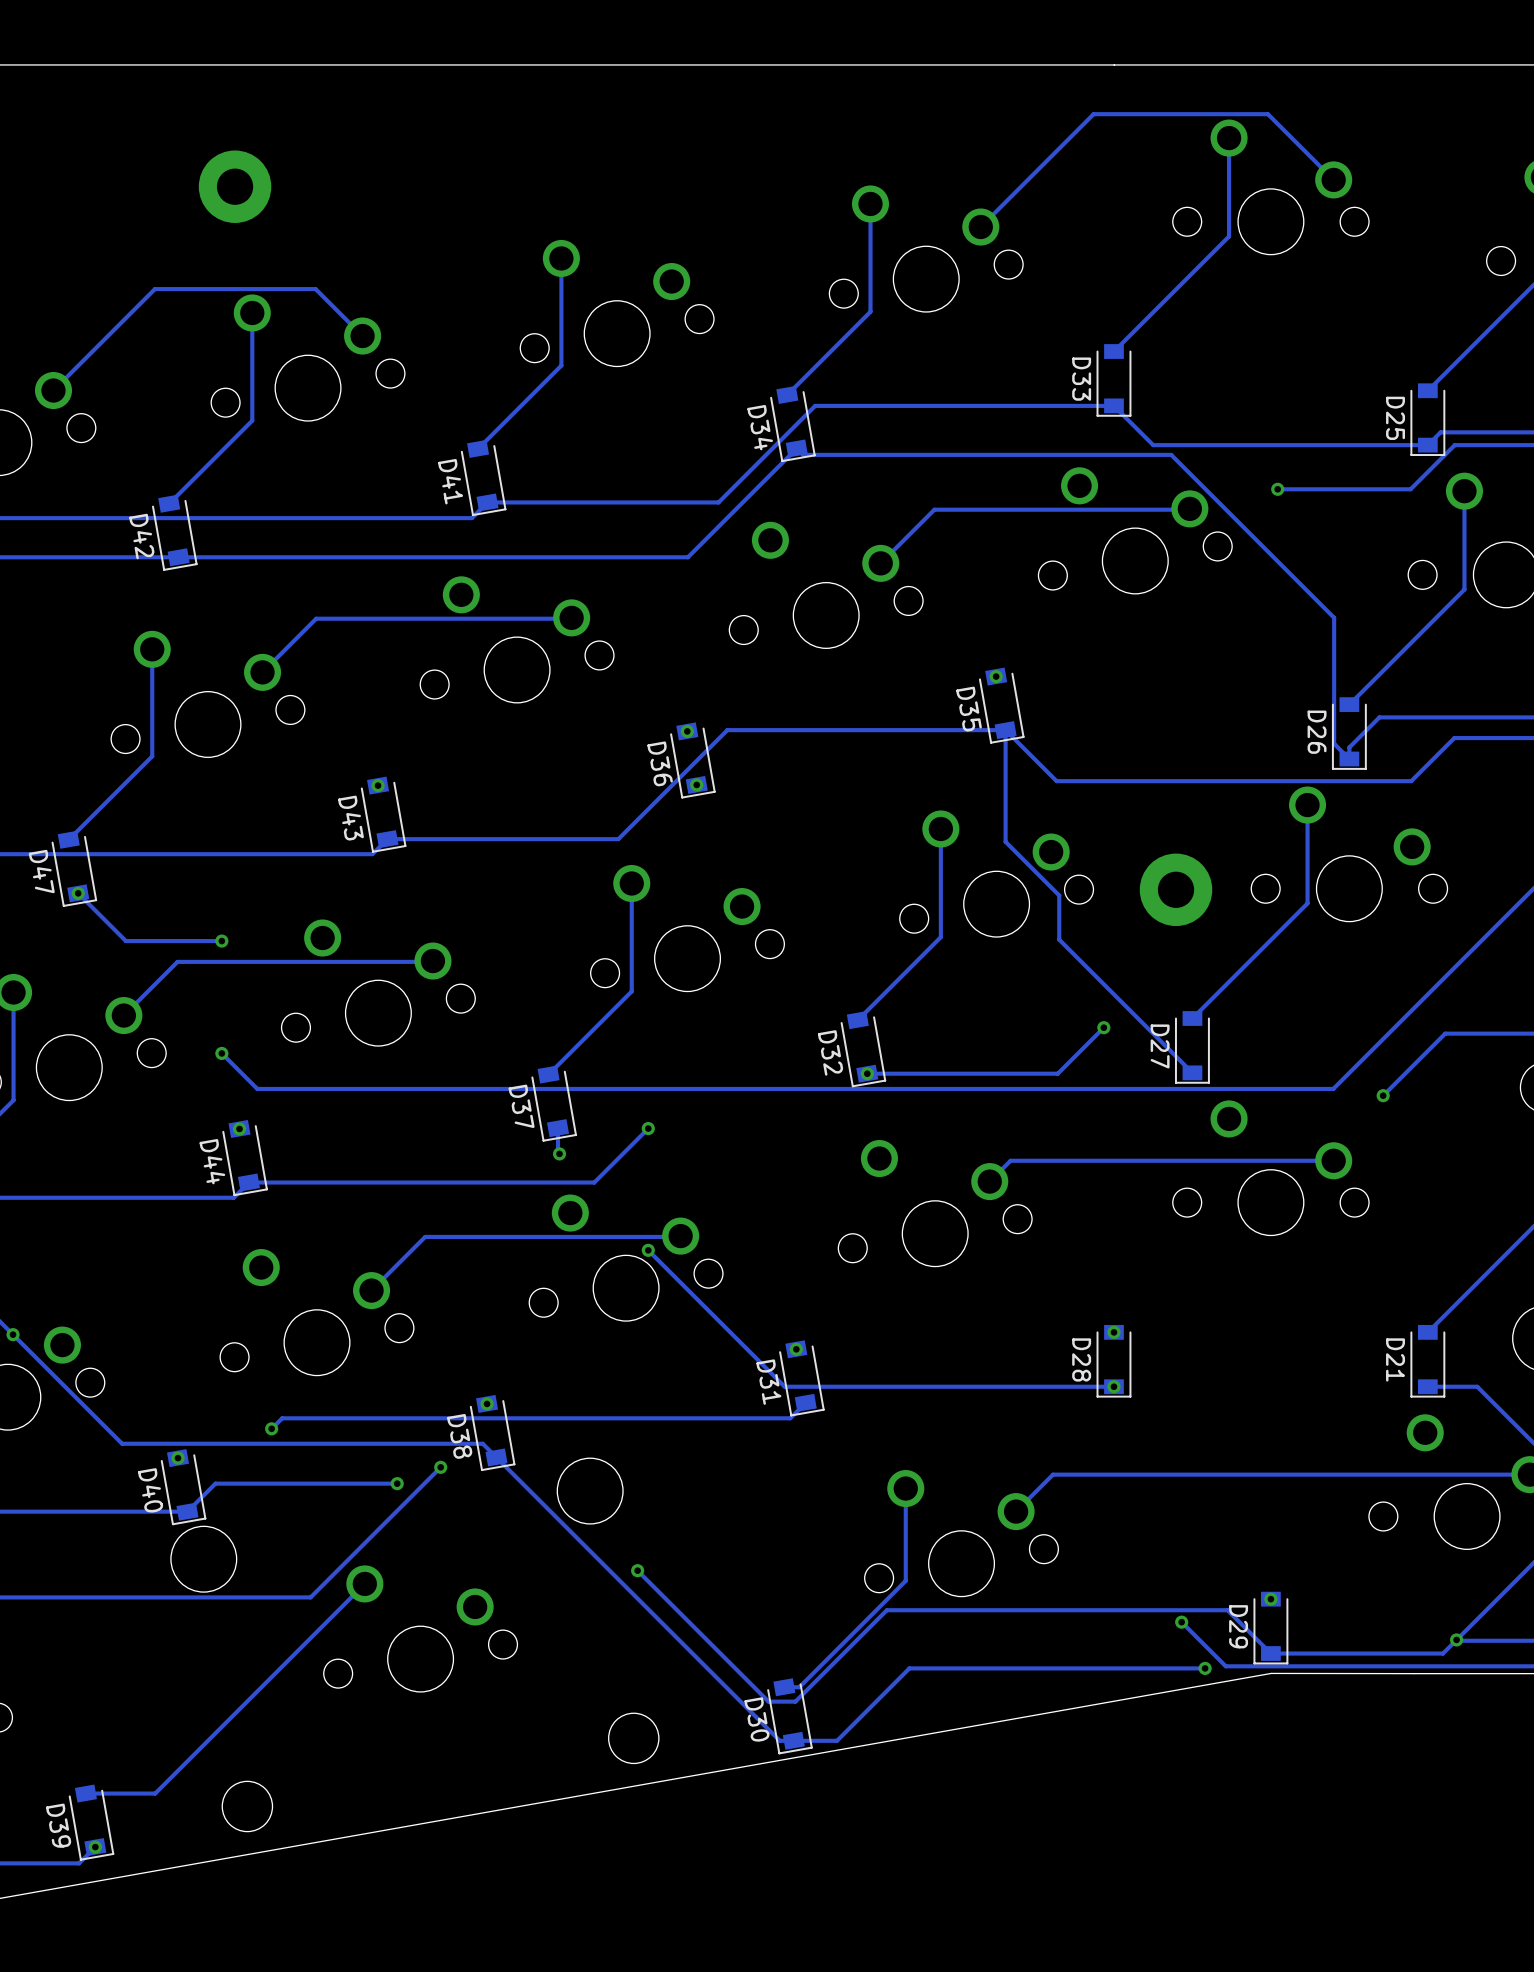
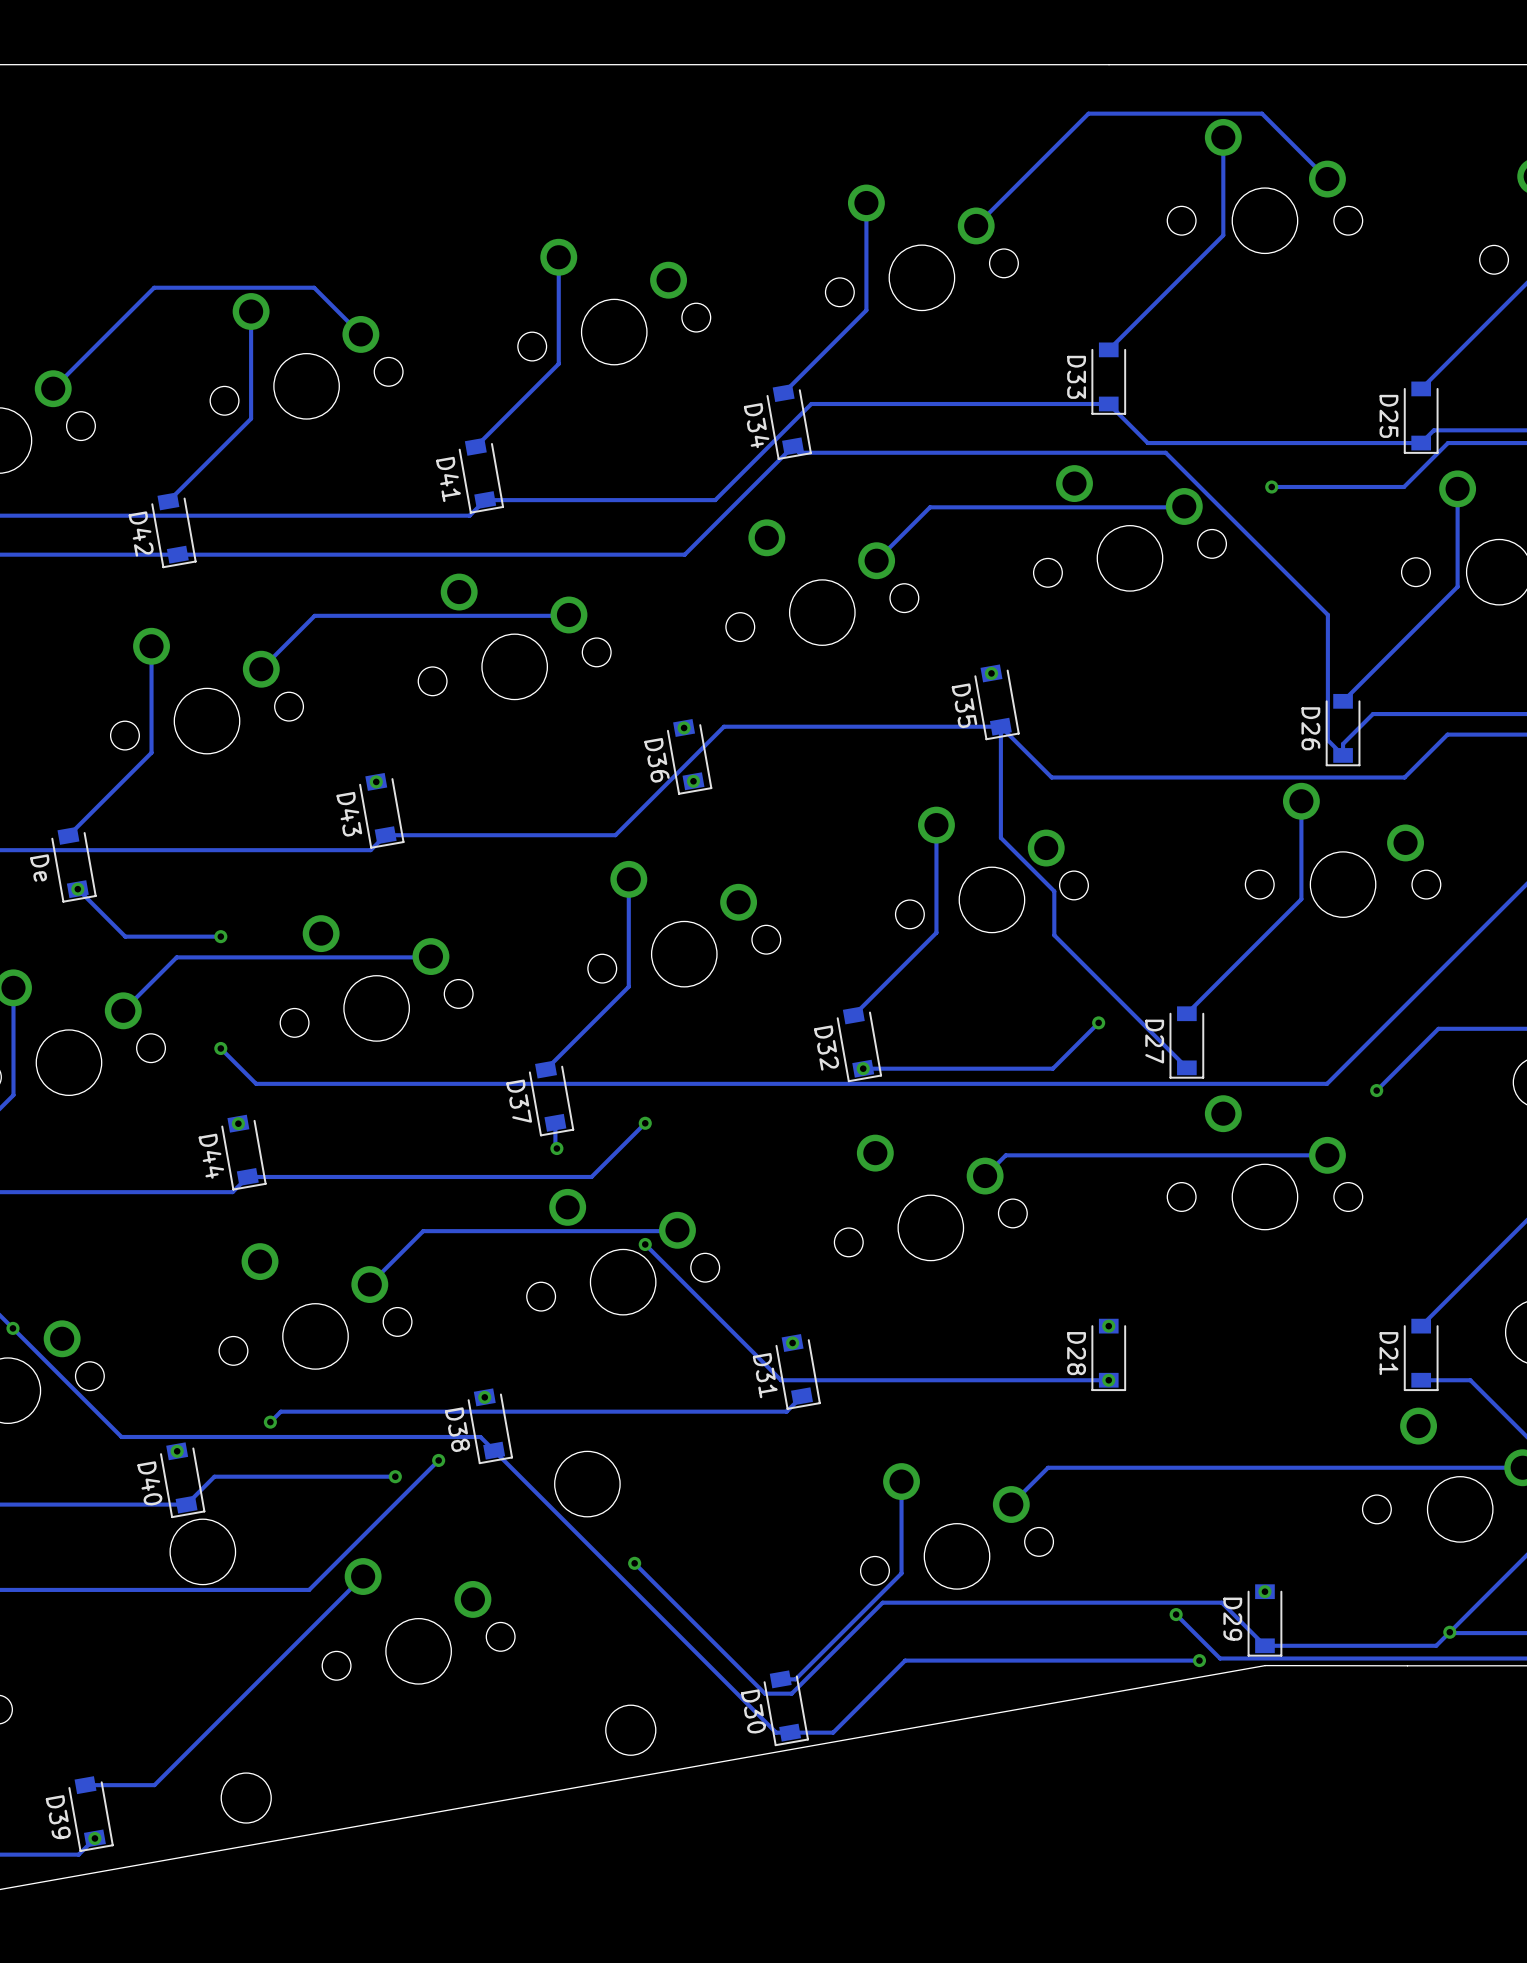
part: (235, 186) -> none
D47 name: D47 (41, 871) -> De (39, 868)
part: (1176, 889) -> none

